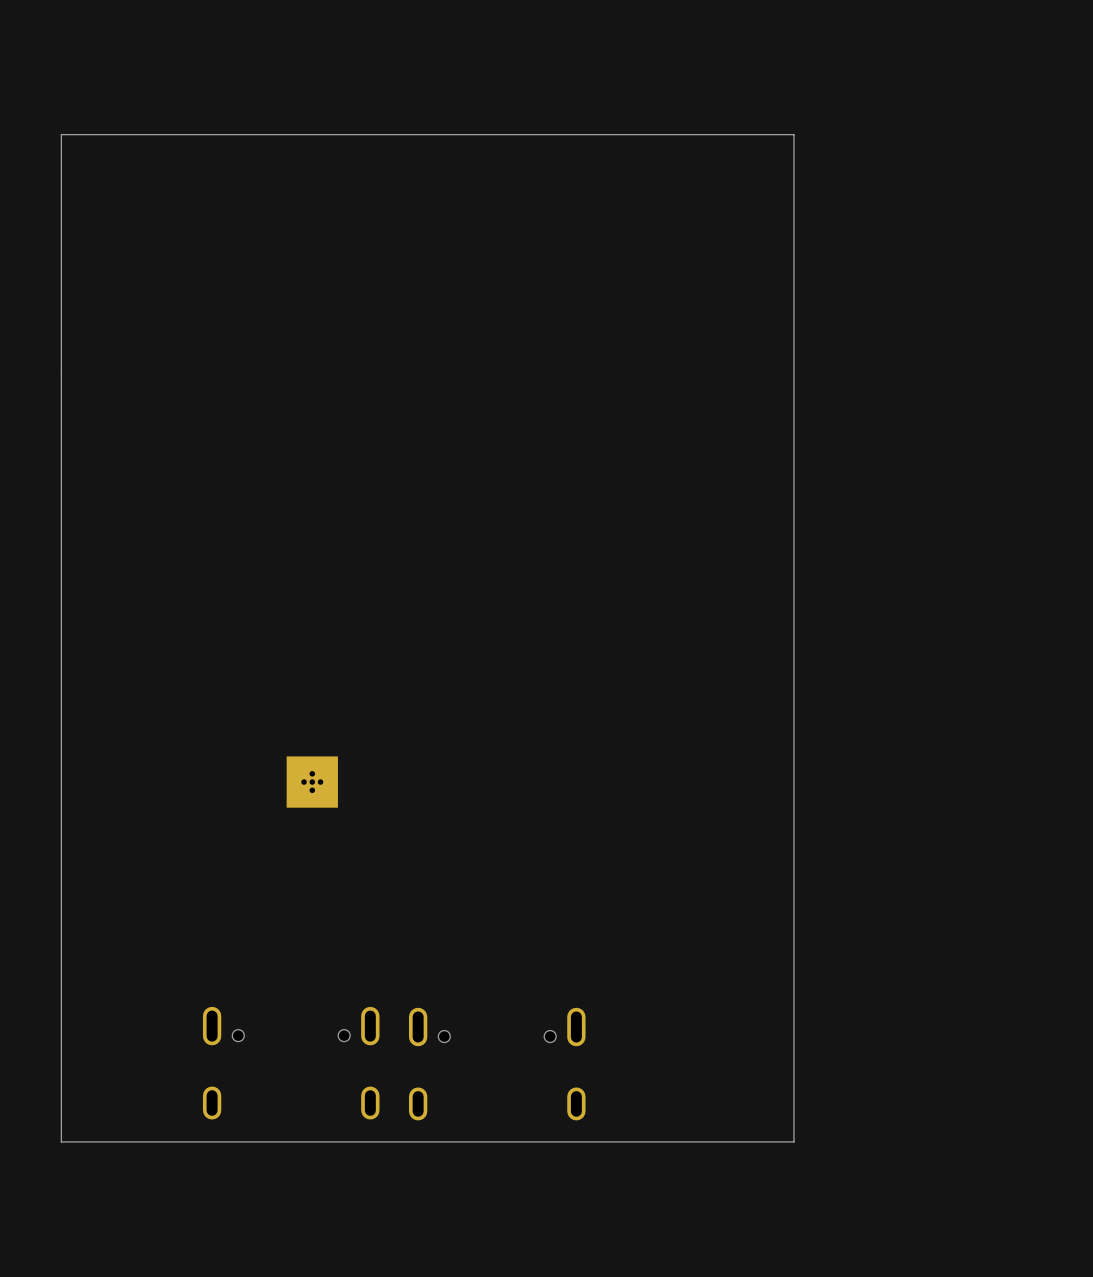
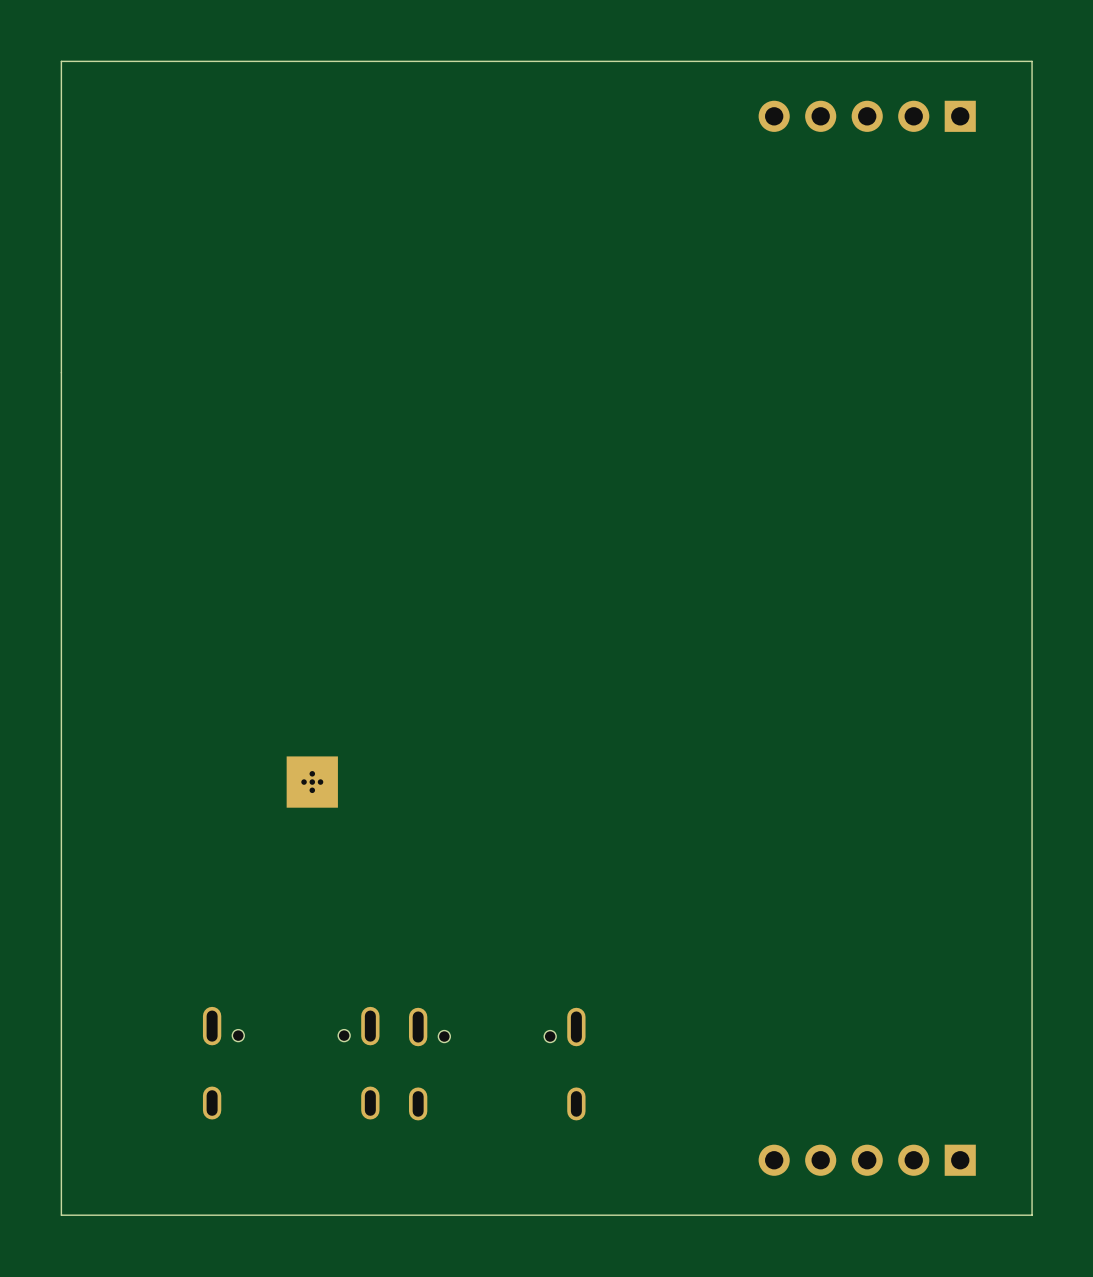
part: none -> (867, 116)
board edge: (61, 134) (793, 134) (793, 1141) (61, 1141) -> (61, 134) (61, 61) (1032, 61) (1032, 1215) (61, 1215) (61, 1141)
part: none -> (867, 1160)

